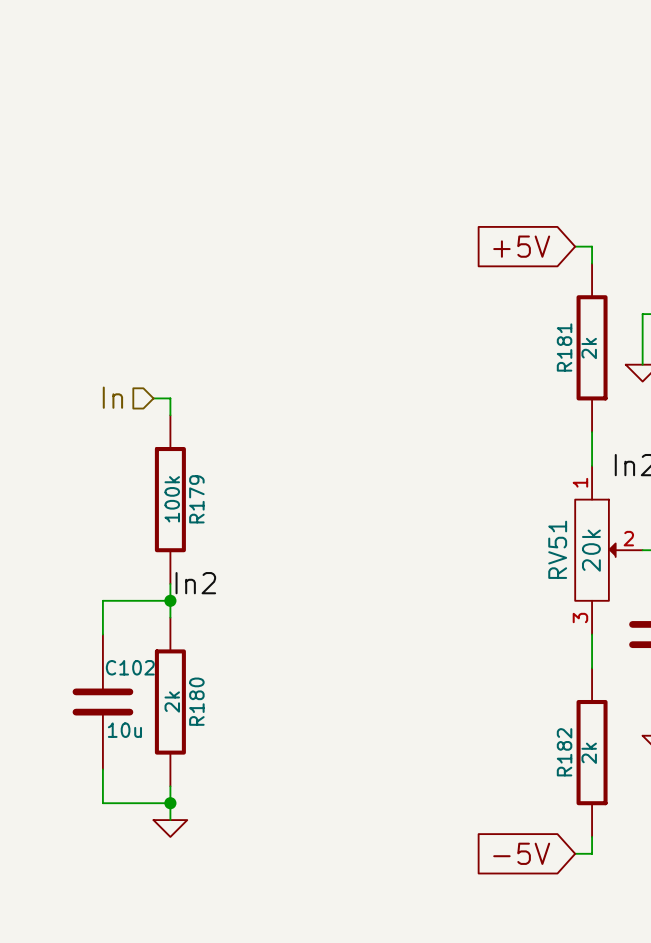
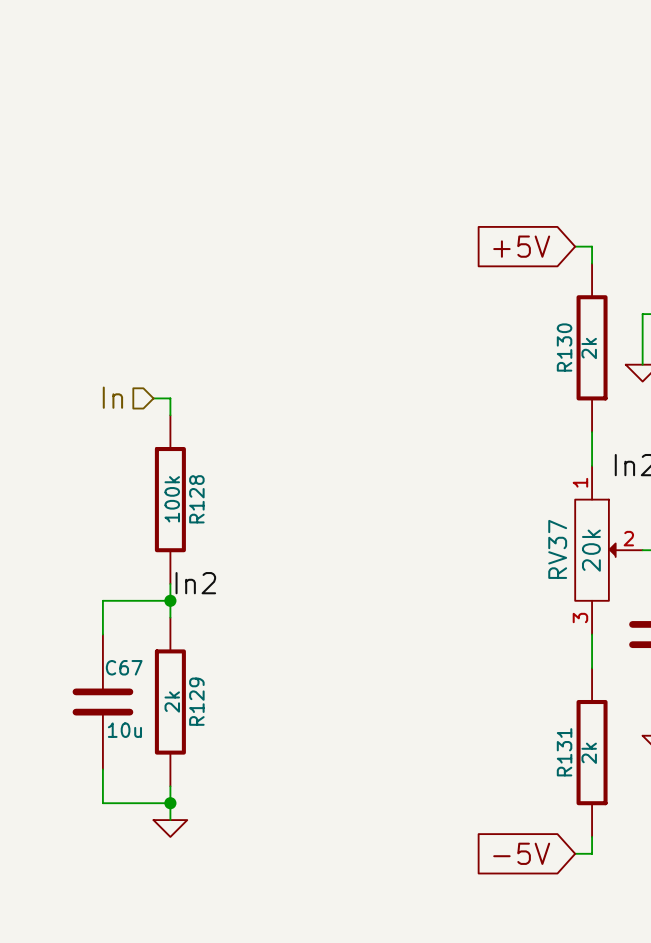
R181 name: R181 (564, 347) -> R130 (564, 347)
R179 name: R179 (196, 499) -> R128 (196, 499)
RV51 name: RV51 (557, 549) -> RV37 (557, 549)
C102 name: C102 (130, 667) -> C67 (124, 667)
R180 name: R180 (196, 701) -> R129 (196, 701)
R182 name: R182 (564, 752) -> R131 (564, 752)

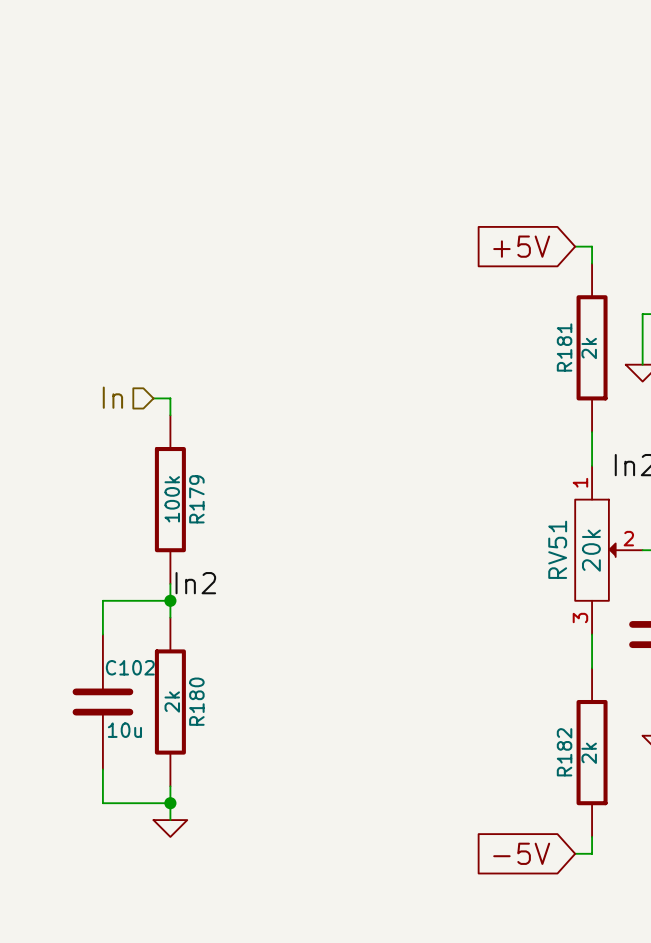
R130 name: R130 (564, 347) -> R181 (564, 347)
R128 name: R128 (196, 499) -> R179 (196, 499)
RV37 name: RV37 (557, 549) -> RV51 (557, 549)
C67 name: C67 (124, 667) -> C102 (130, 667)
R129 name: R129 (196, 701) -> R180 (196, 701)
R131 name: R131 (564, 752) -> R182 (564, 752)

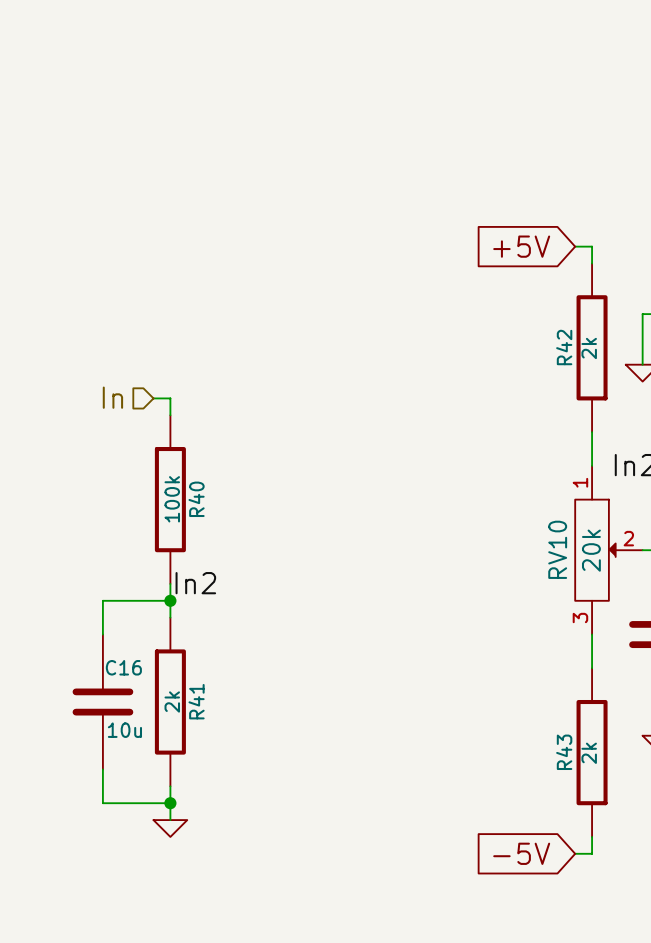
R181 name: R181 (564, 347) -> R42 (564, 347)
R179 name: R179 (196, 499) -> R40 (196, 499)
RV51 name: RV51 (557, 549) -> RV10 (557, 549)
C102 name: C102 (130, 667) -> C16 (123, 667)
R180 name: R180 (196, 701) -> R41 (196, 701)
R182 name: R182 (564, 752) -> R43 (564, 752)

